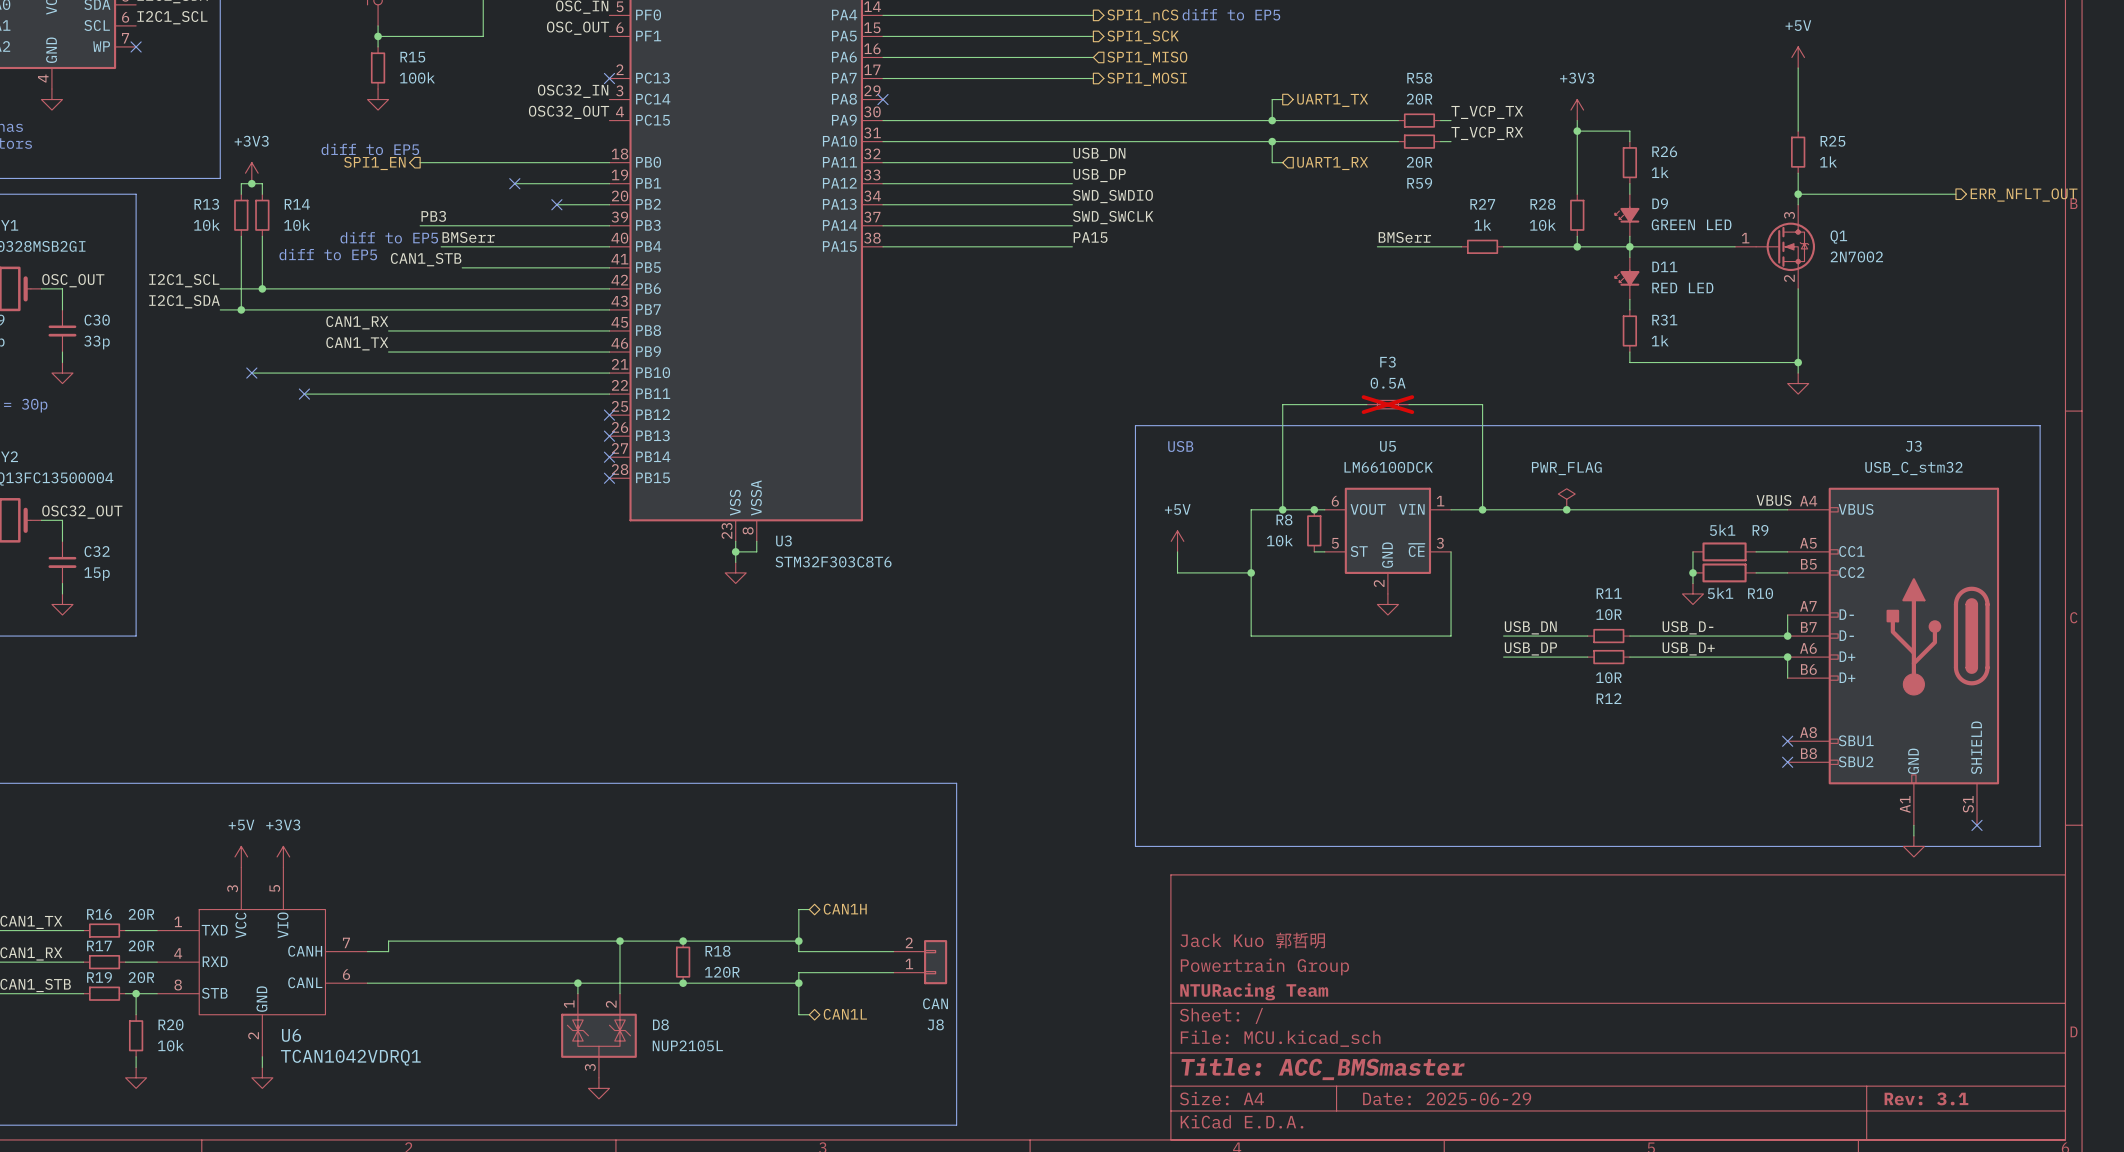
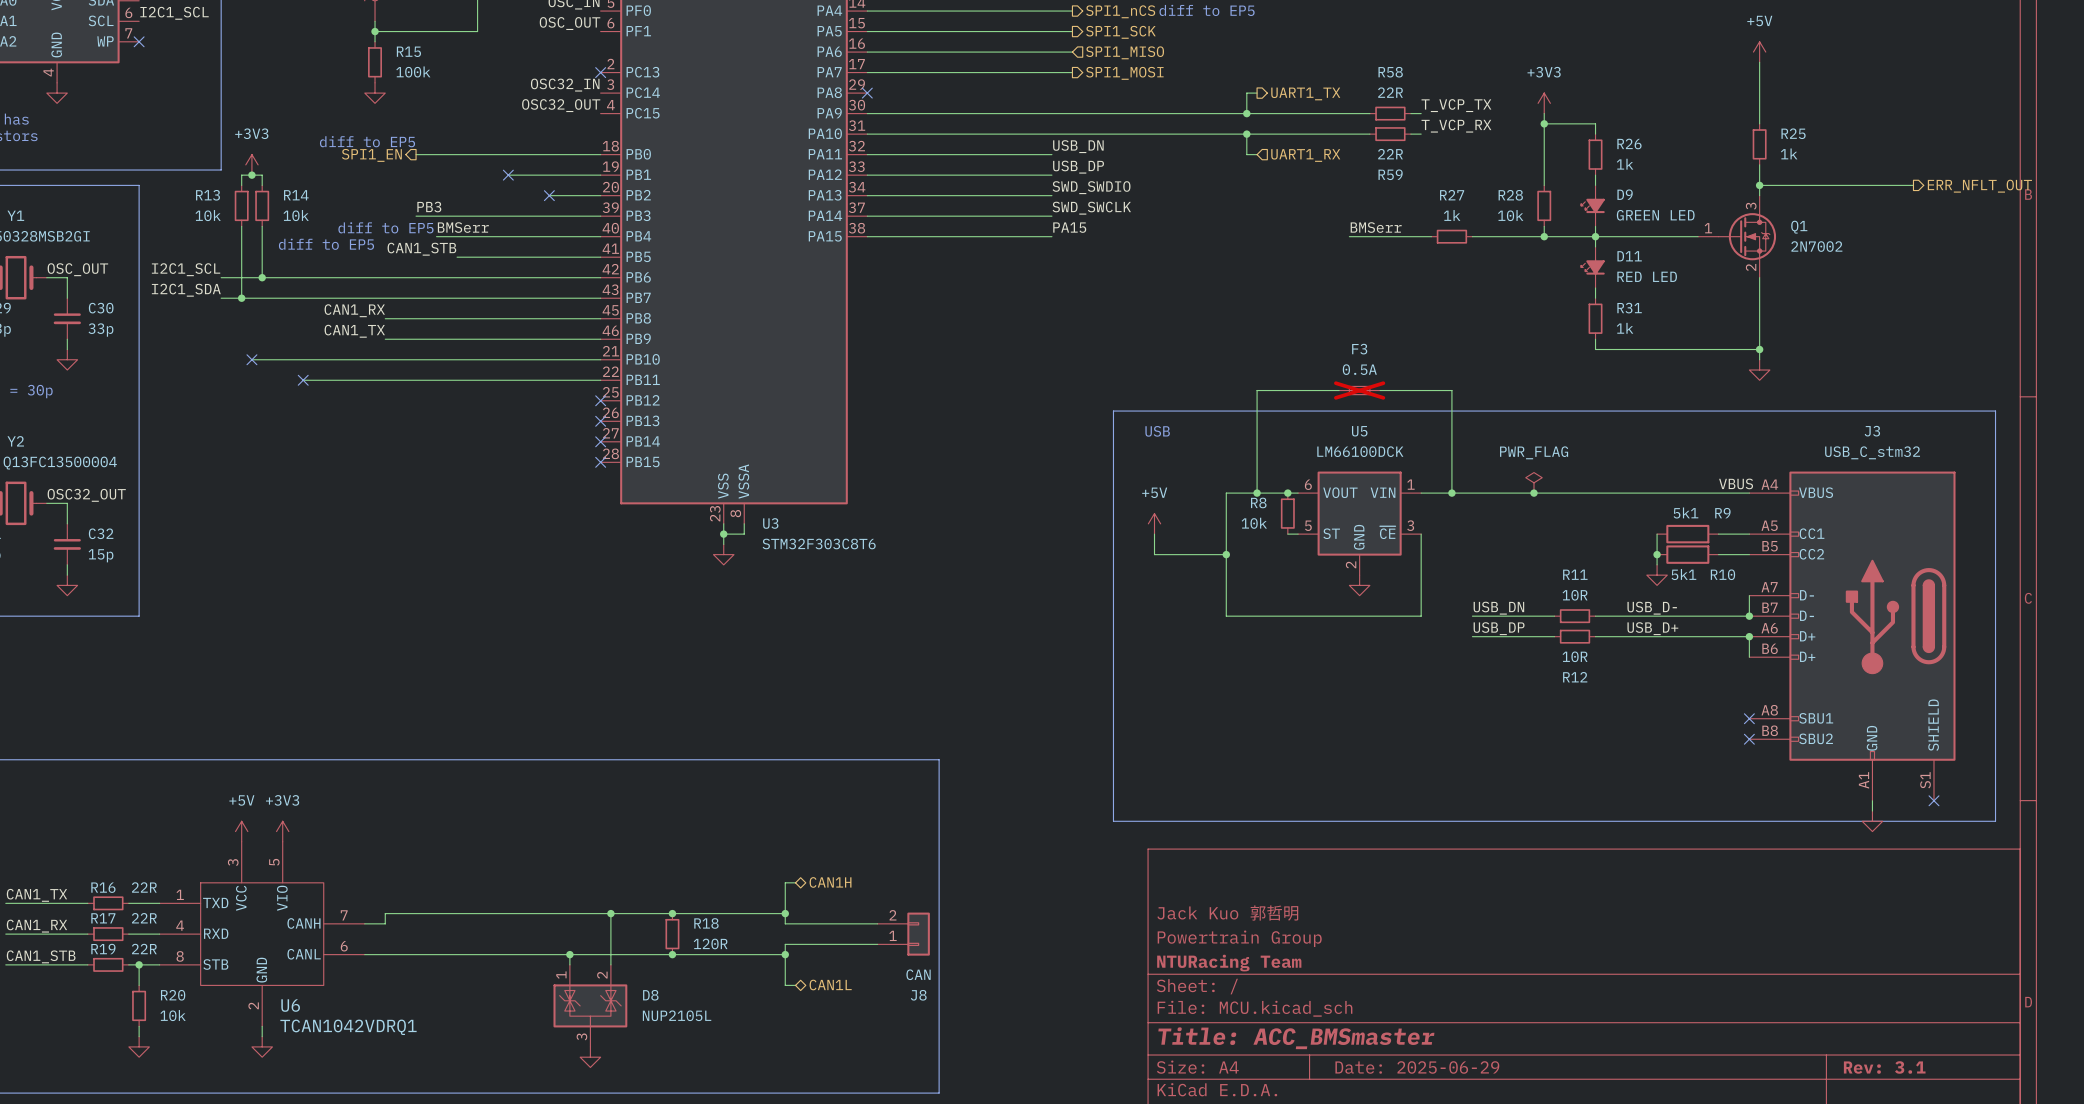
R58 value: 20R (1419, 99) -> 22R (1390, 92)
R59 value: 20R (1419, 162) -> 22R (1390, 154)
R16 value: 20R (141, 914) -> 22R (144, 887)
R17 value: 20R (141, 945) -> 22R (144, 918)
R19 value: 20R (141, 977) -> 22R (144, 949)

